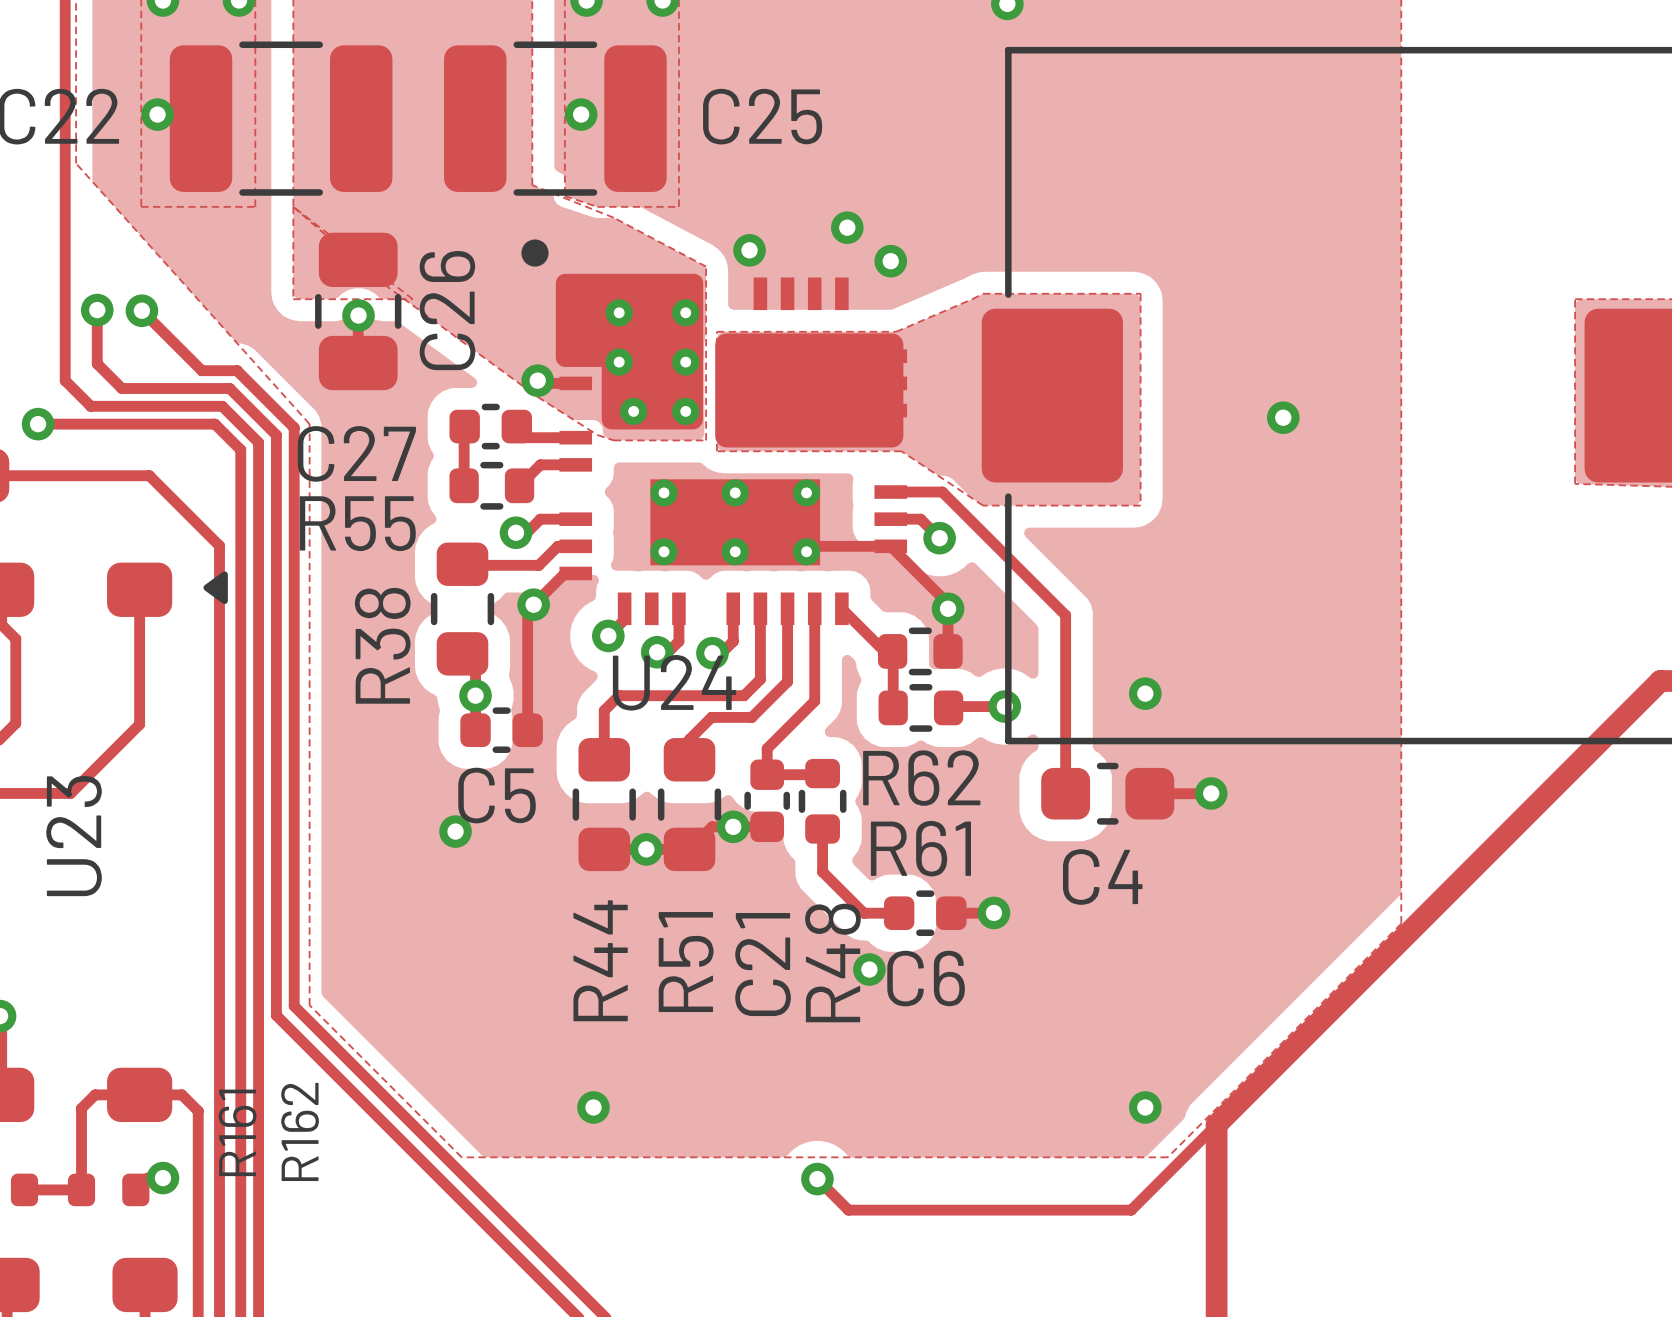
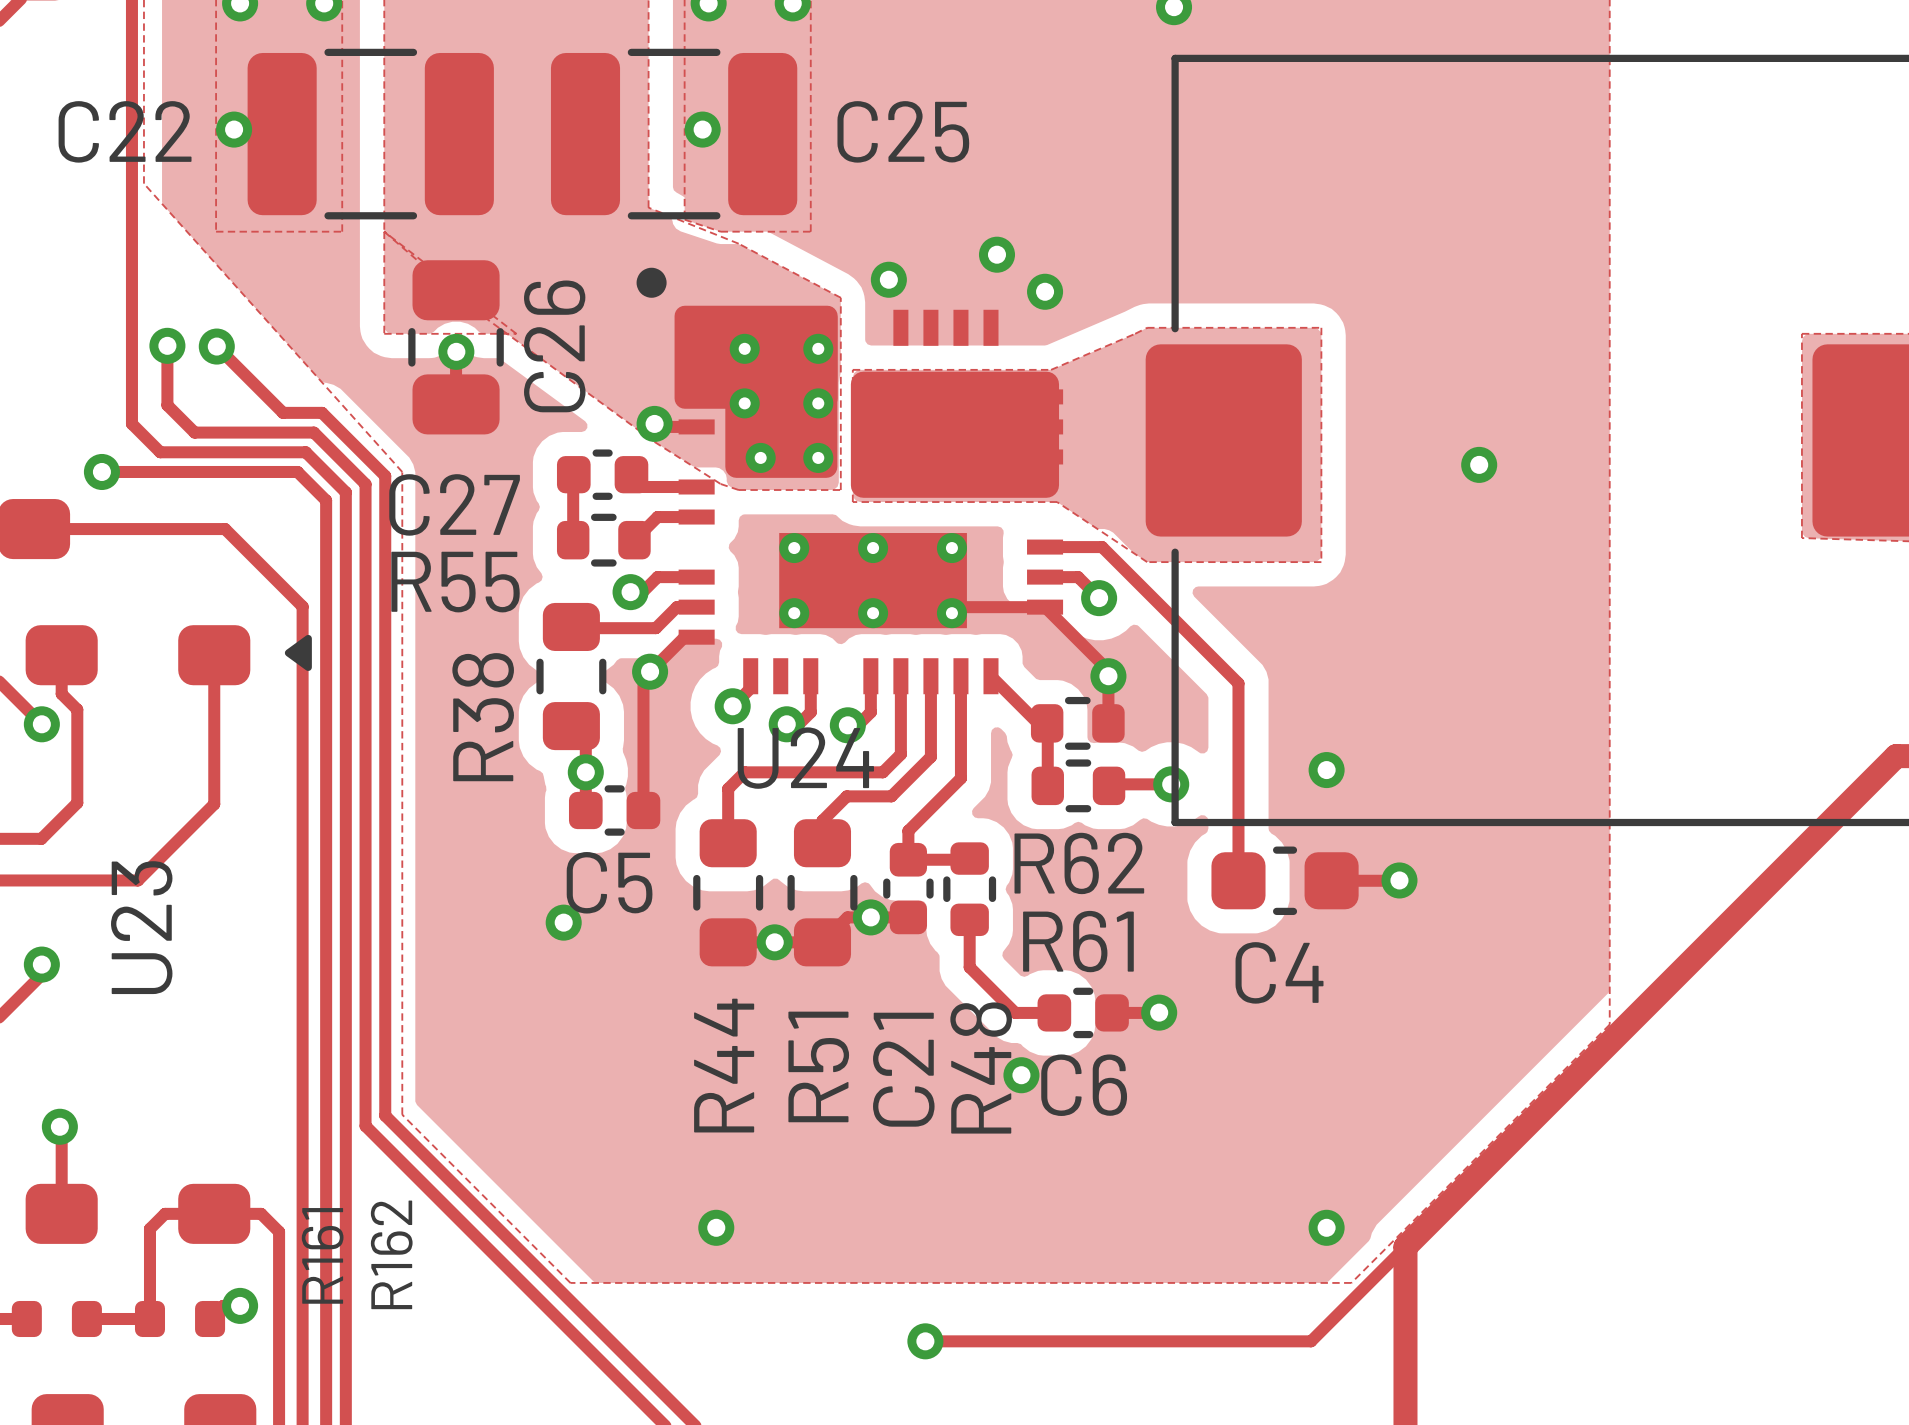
track: (817, 1179) (848, 1210) -> (925, 1341) (998, 1341)
via position: (817, 1179) -> (925, 1341)

